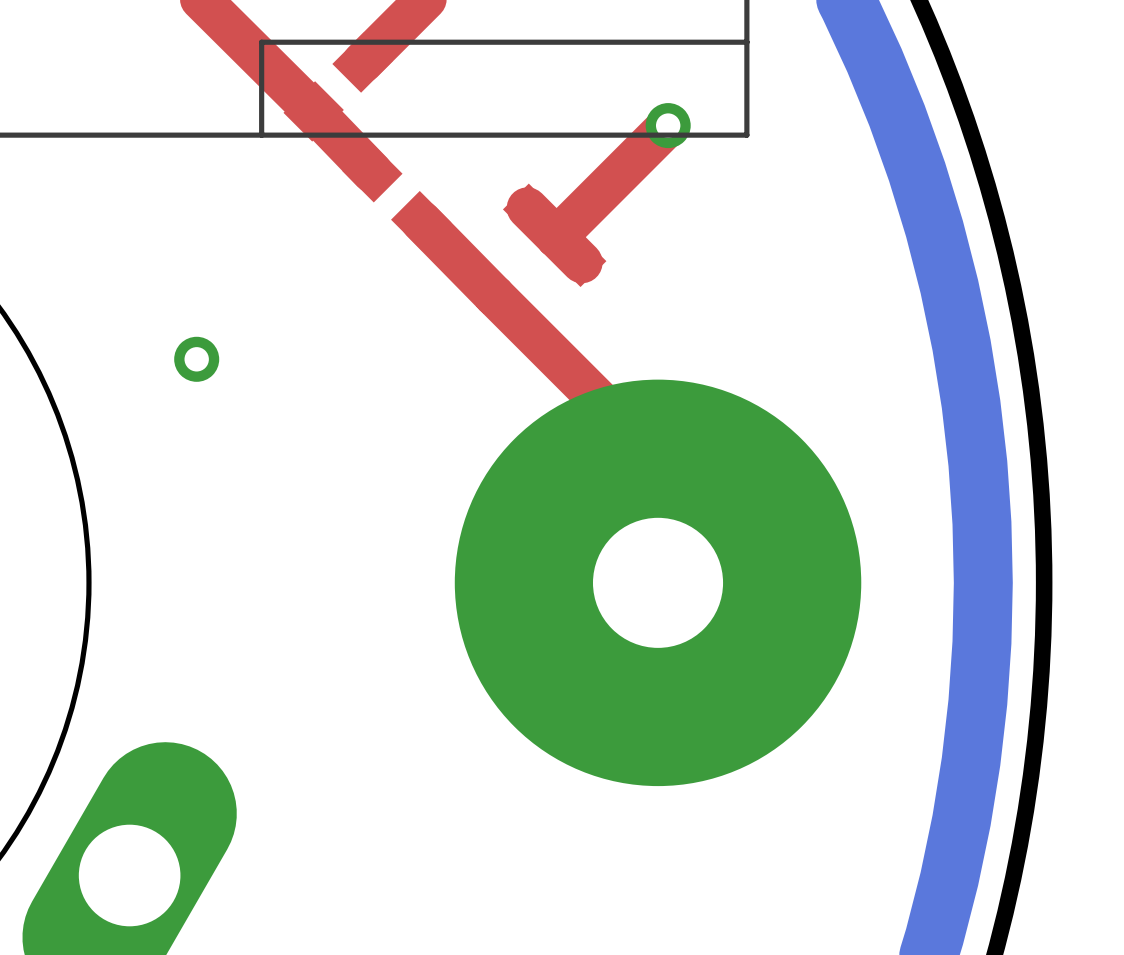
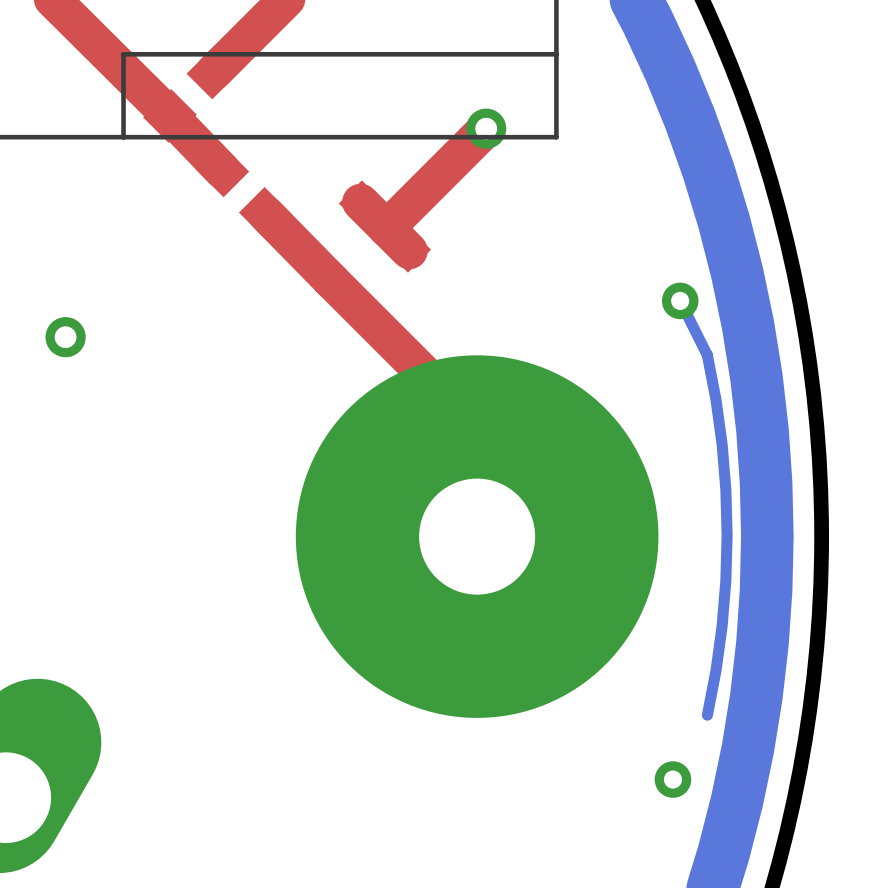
bottom track: none -> (680, 300) (707, 355) (716, 399) (725, 489) (725, 580) (716, 670) (707, 715)
via: none -> (680, 300)
via: none -> (672, 779)

